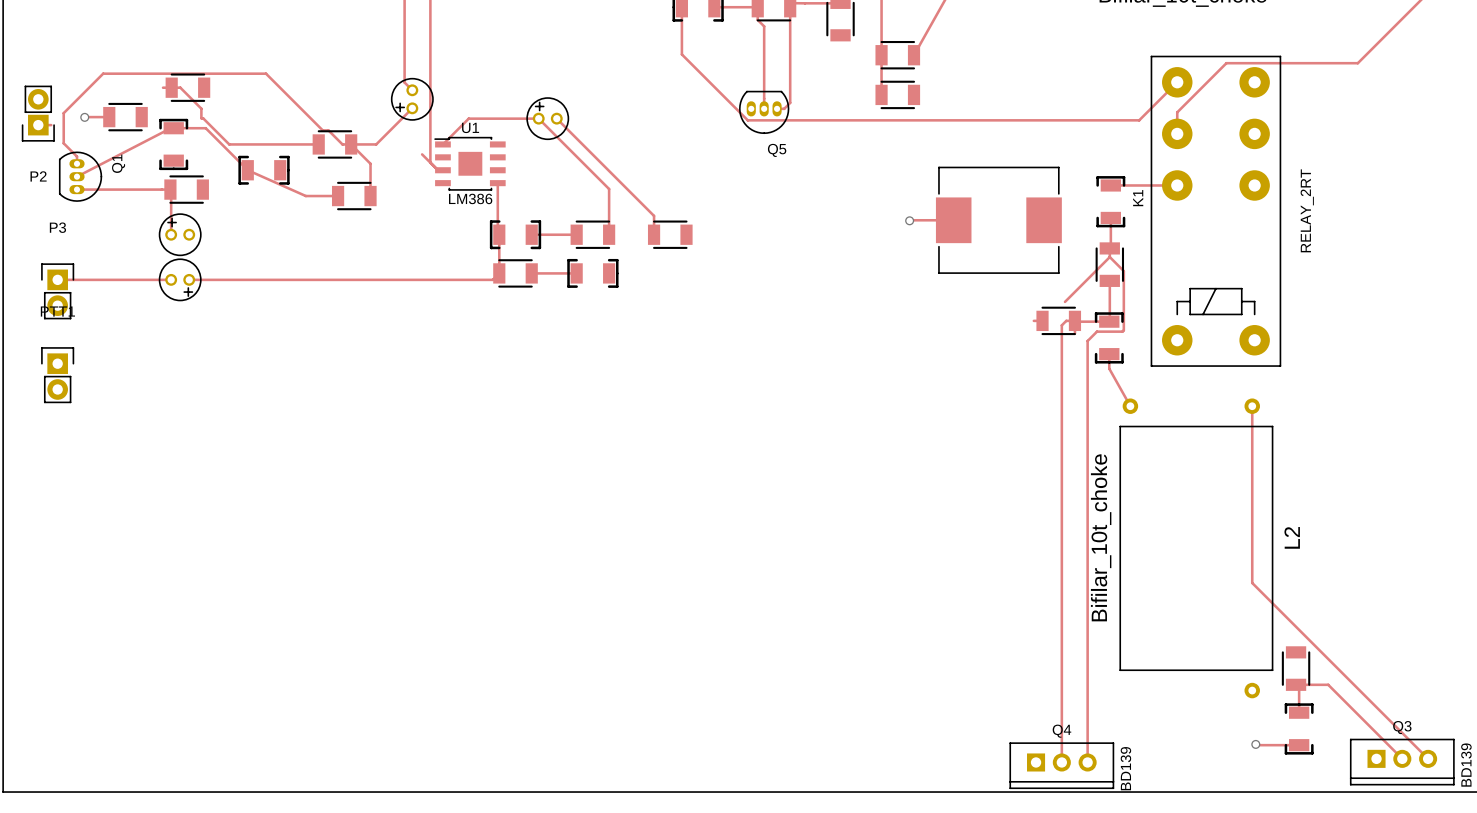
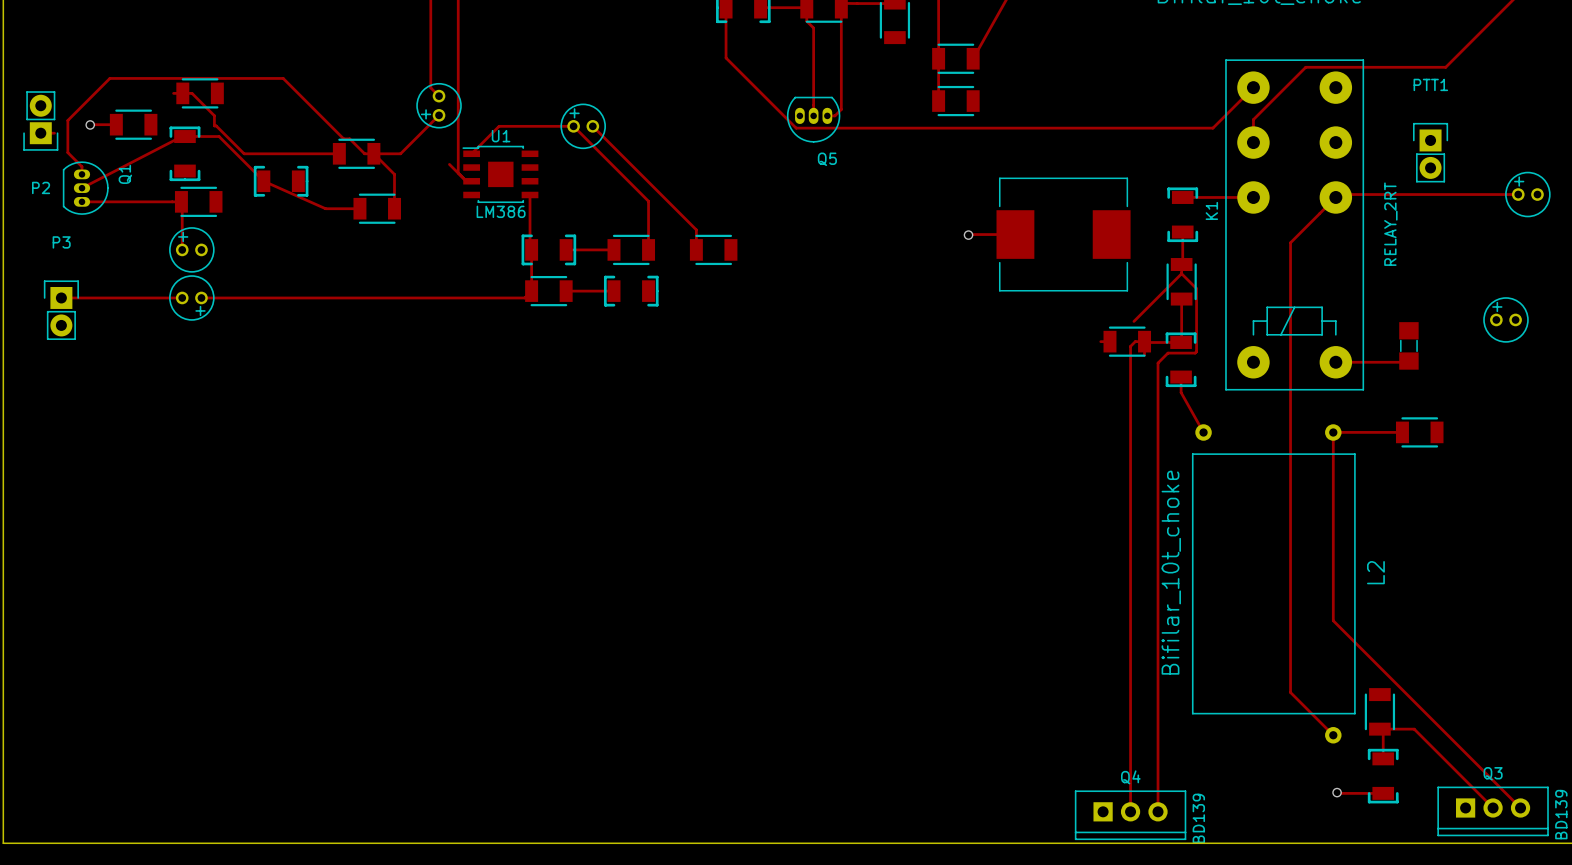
track: none -> (1518, 194) (1338, 194) (1290, 242) (1290, 692) (1333, 735)
part: none -> (1527, 194)
part: none -> (1505, 319)
part: none -> (1408, 345)
track: none -> (1408, 361) (1335, 362)
PTT1 position: (57, 375) -> (1430, 152)
track: none -> (1333, 432) (1402, 432)
part: none -> (1419, 432)

